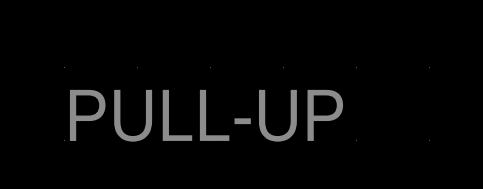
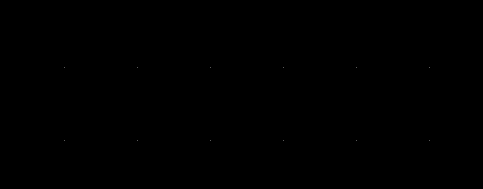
text: PULL-UP (206, 115) -> none

